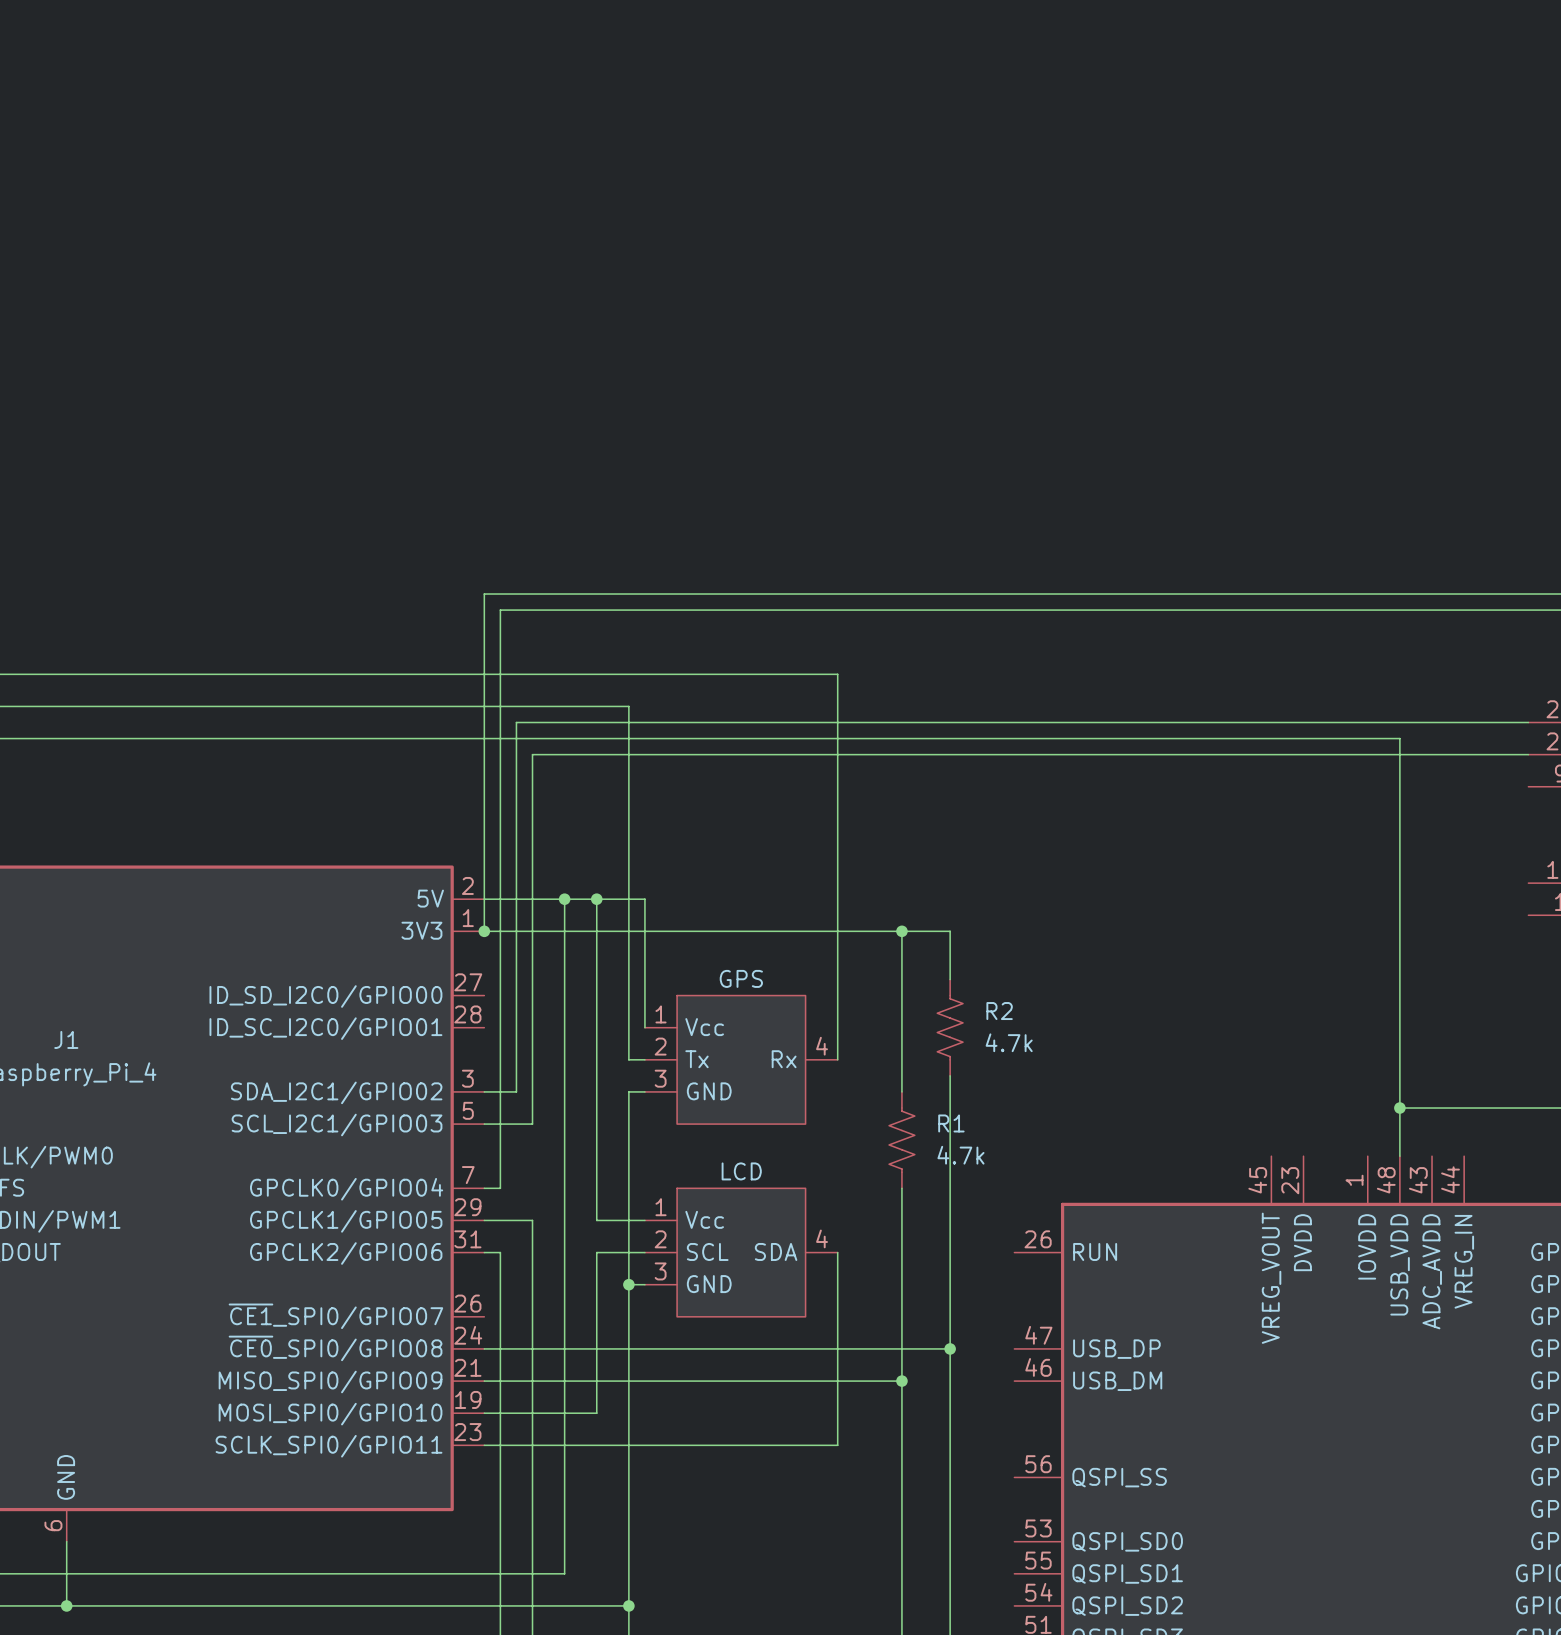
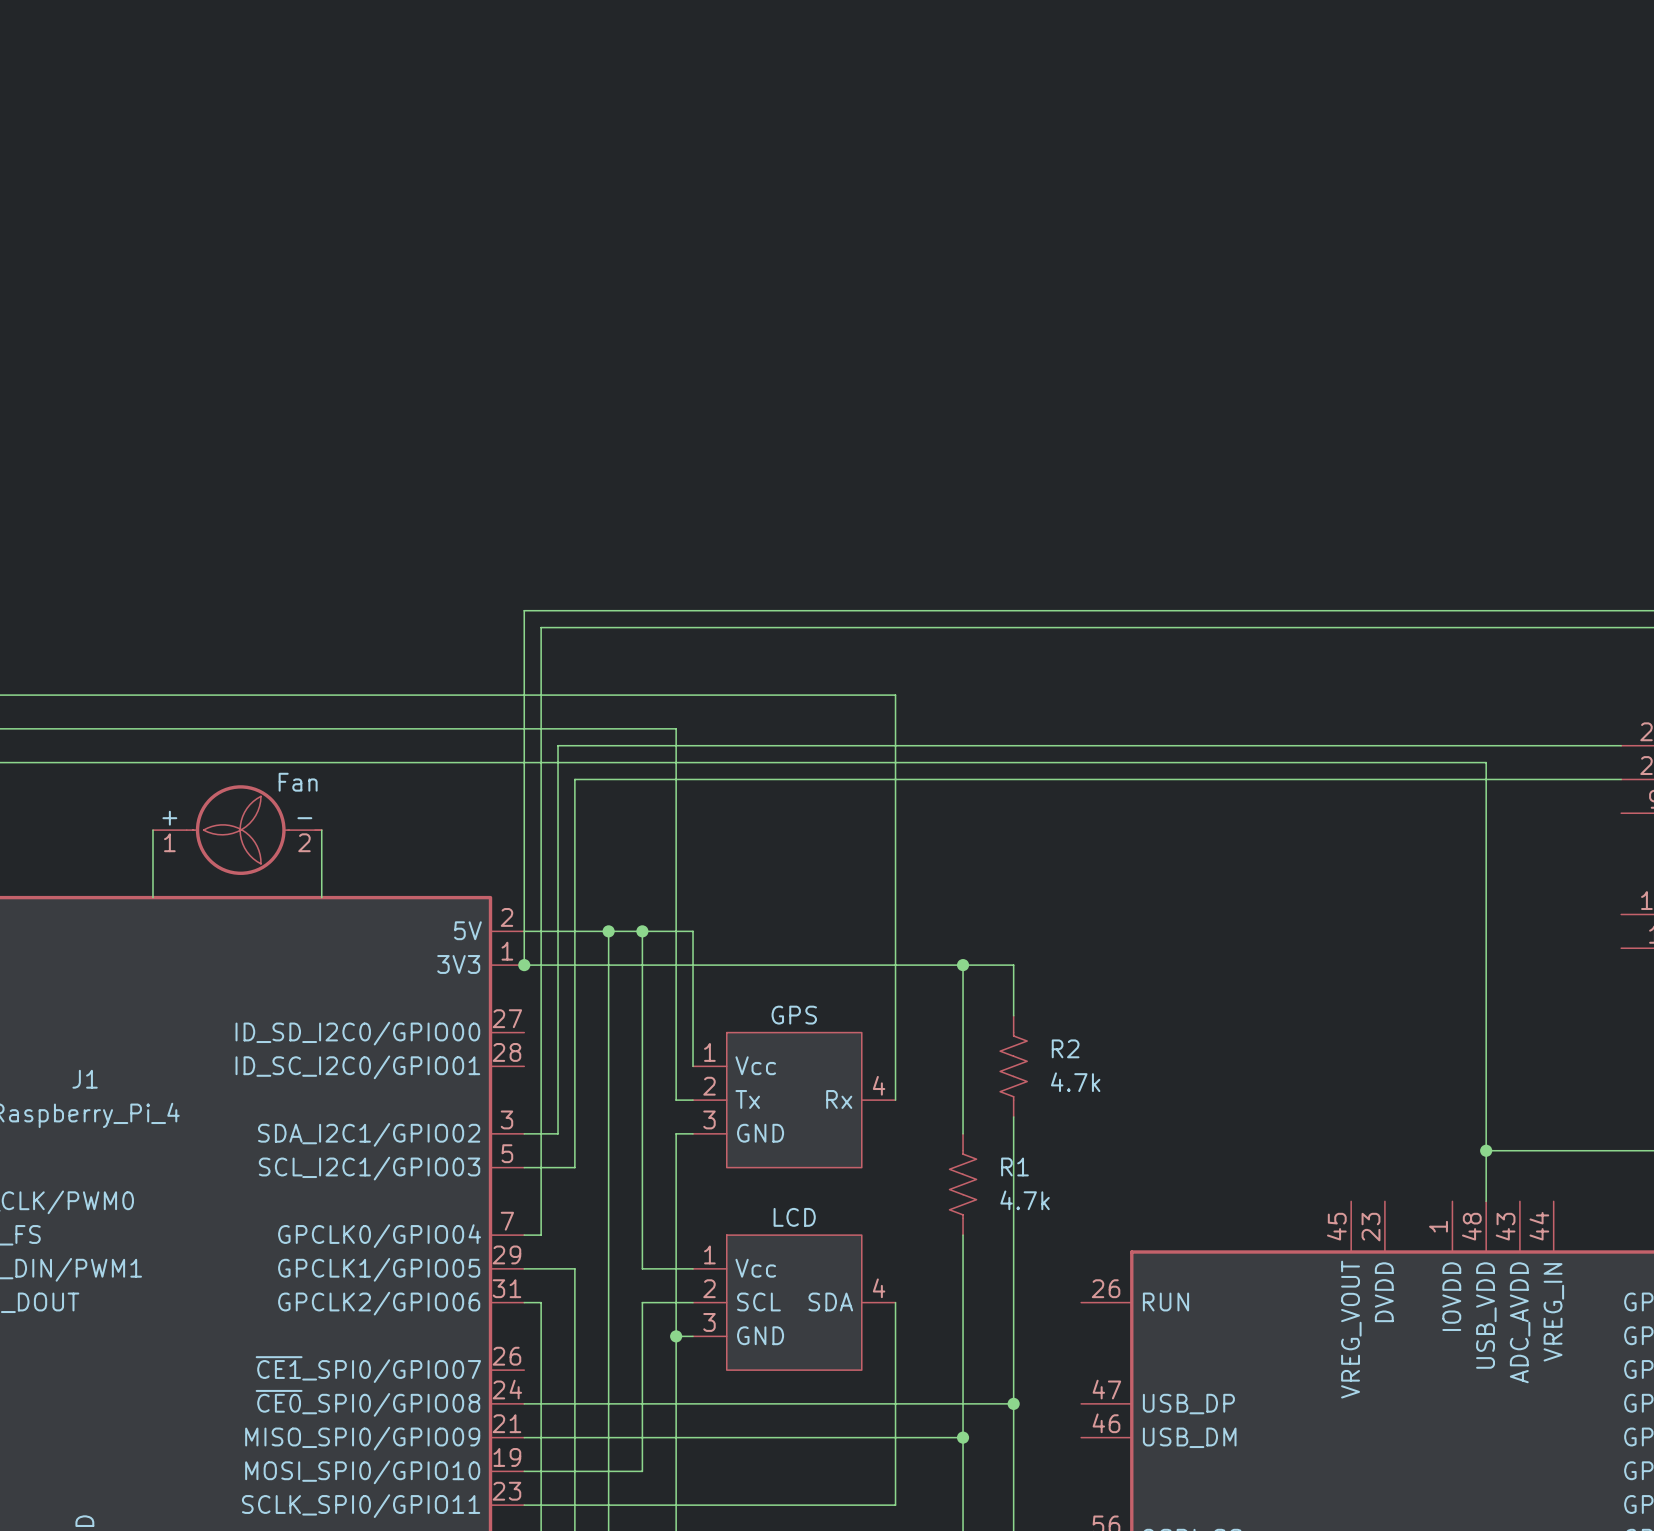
wire: none -> (152, 830) (152, 897)
part: none -> Fan (237, 830)
wire: none -> (321, 830) (321, 897)

